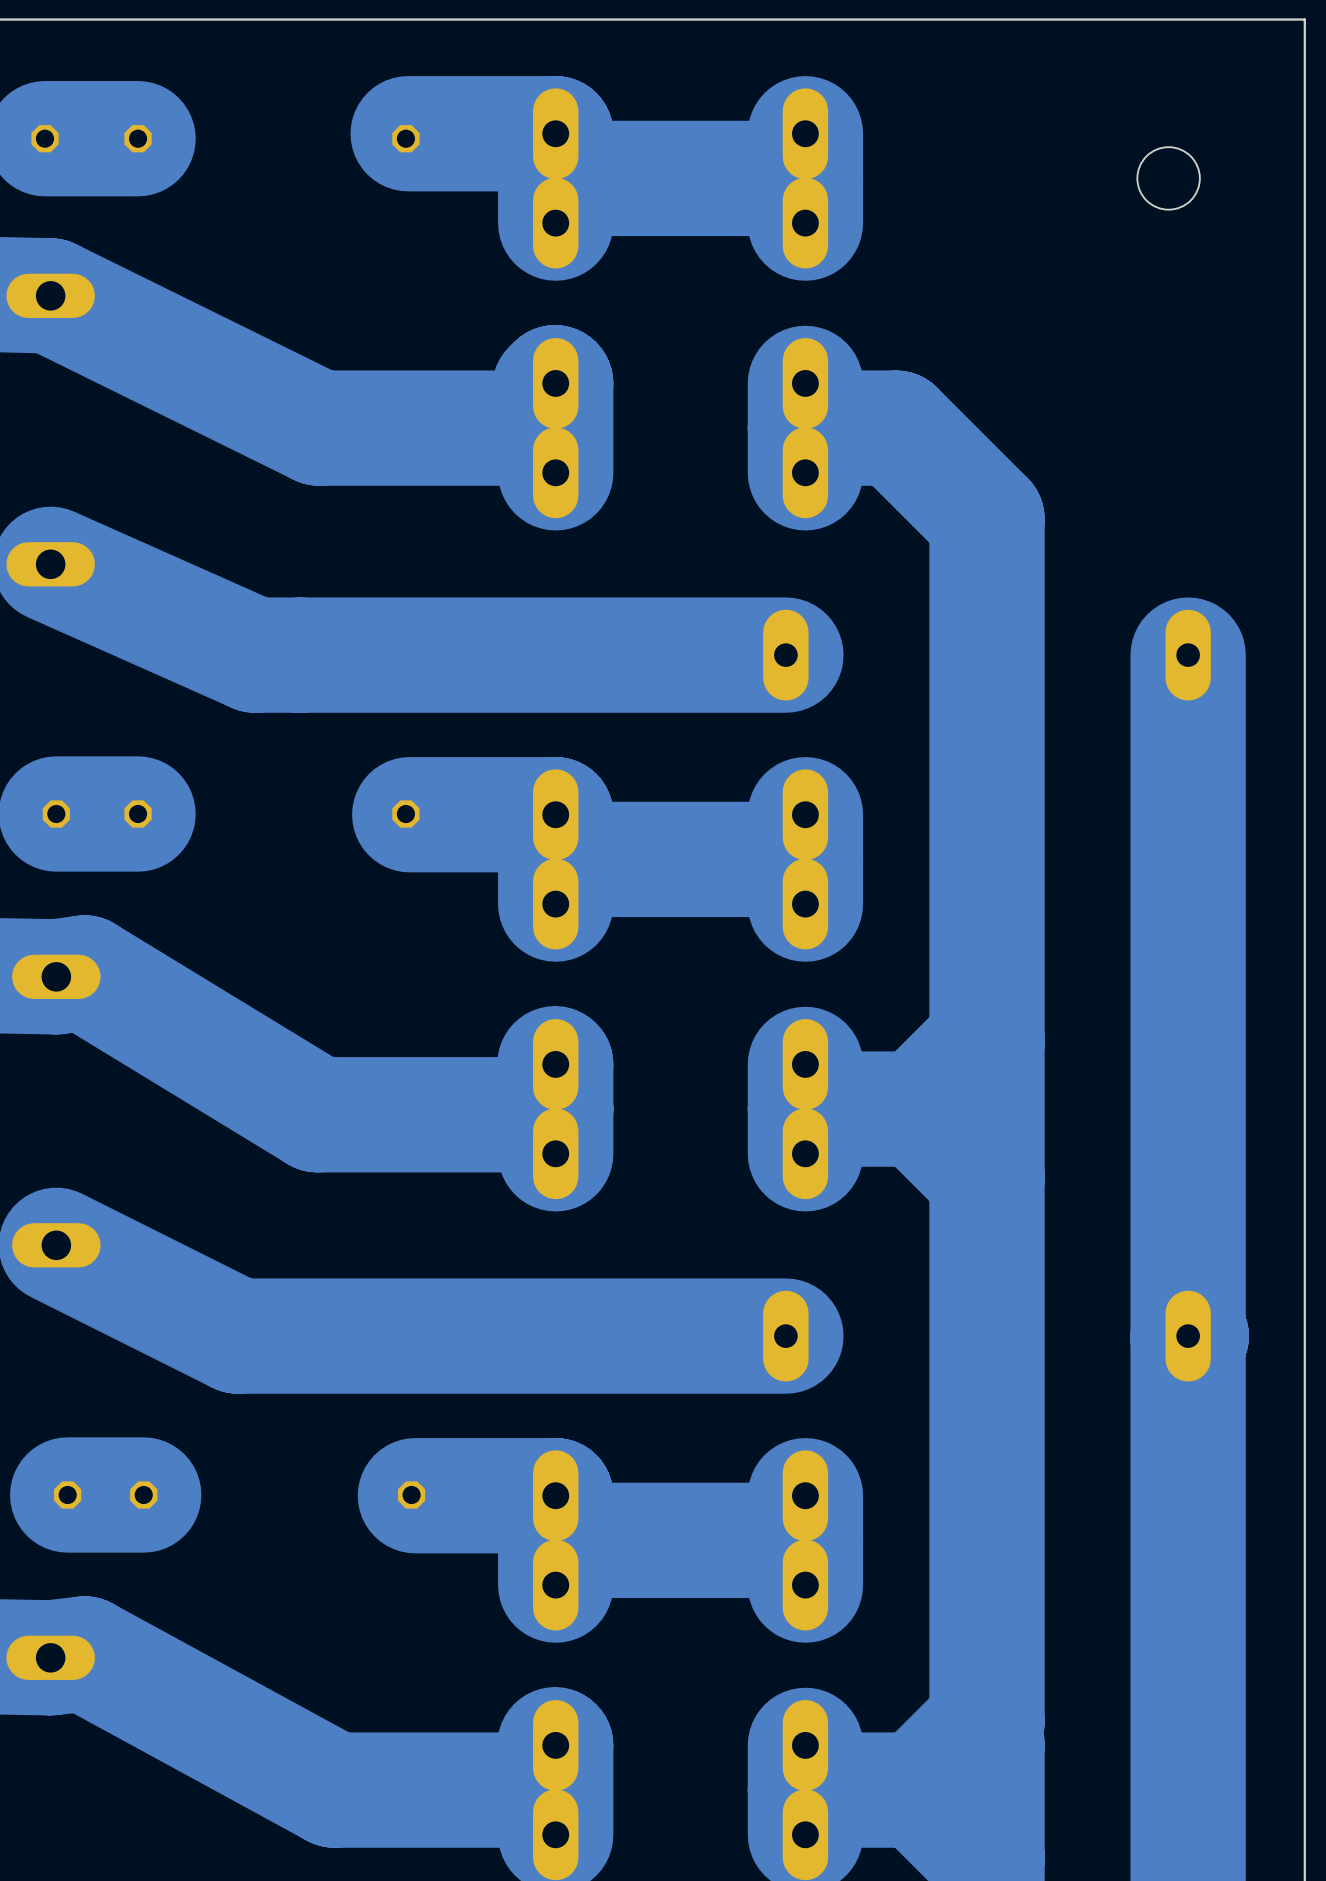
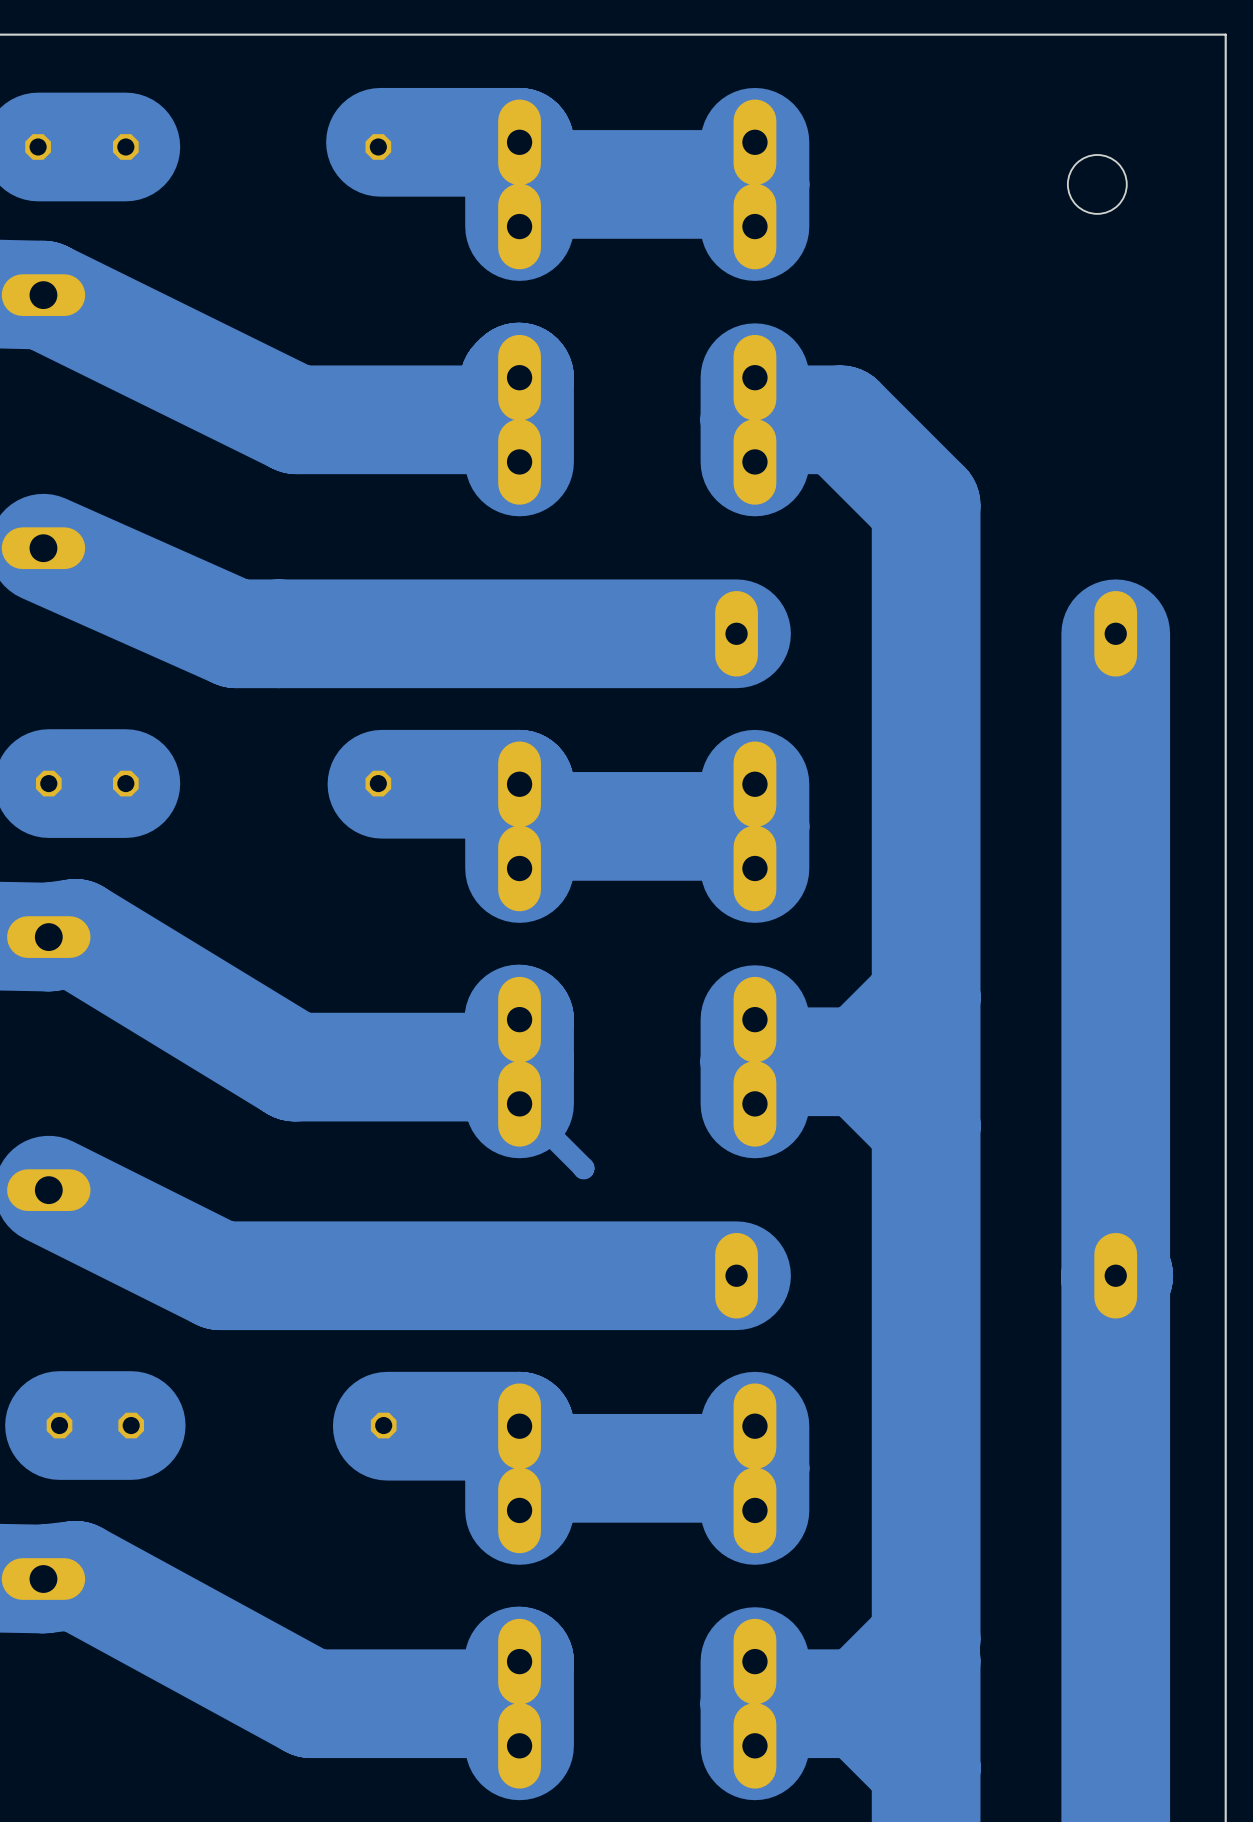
track: none -> (519, 1103) (583, 1168)

